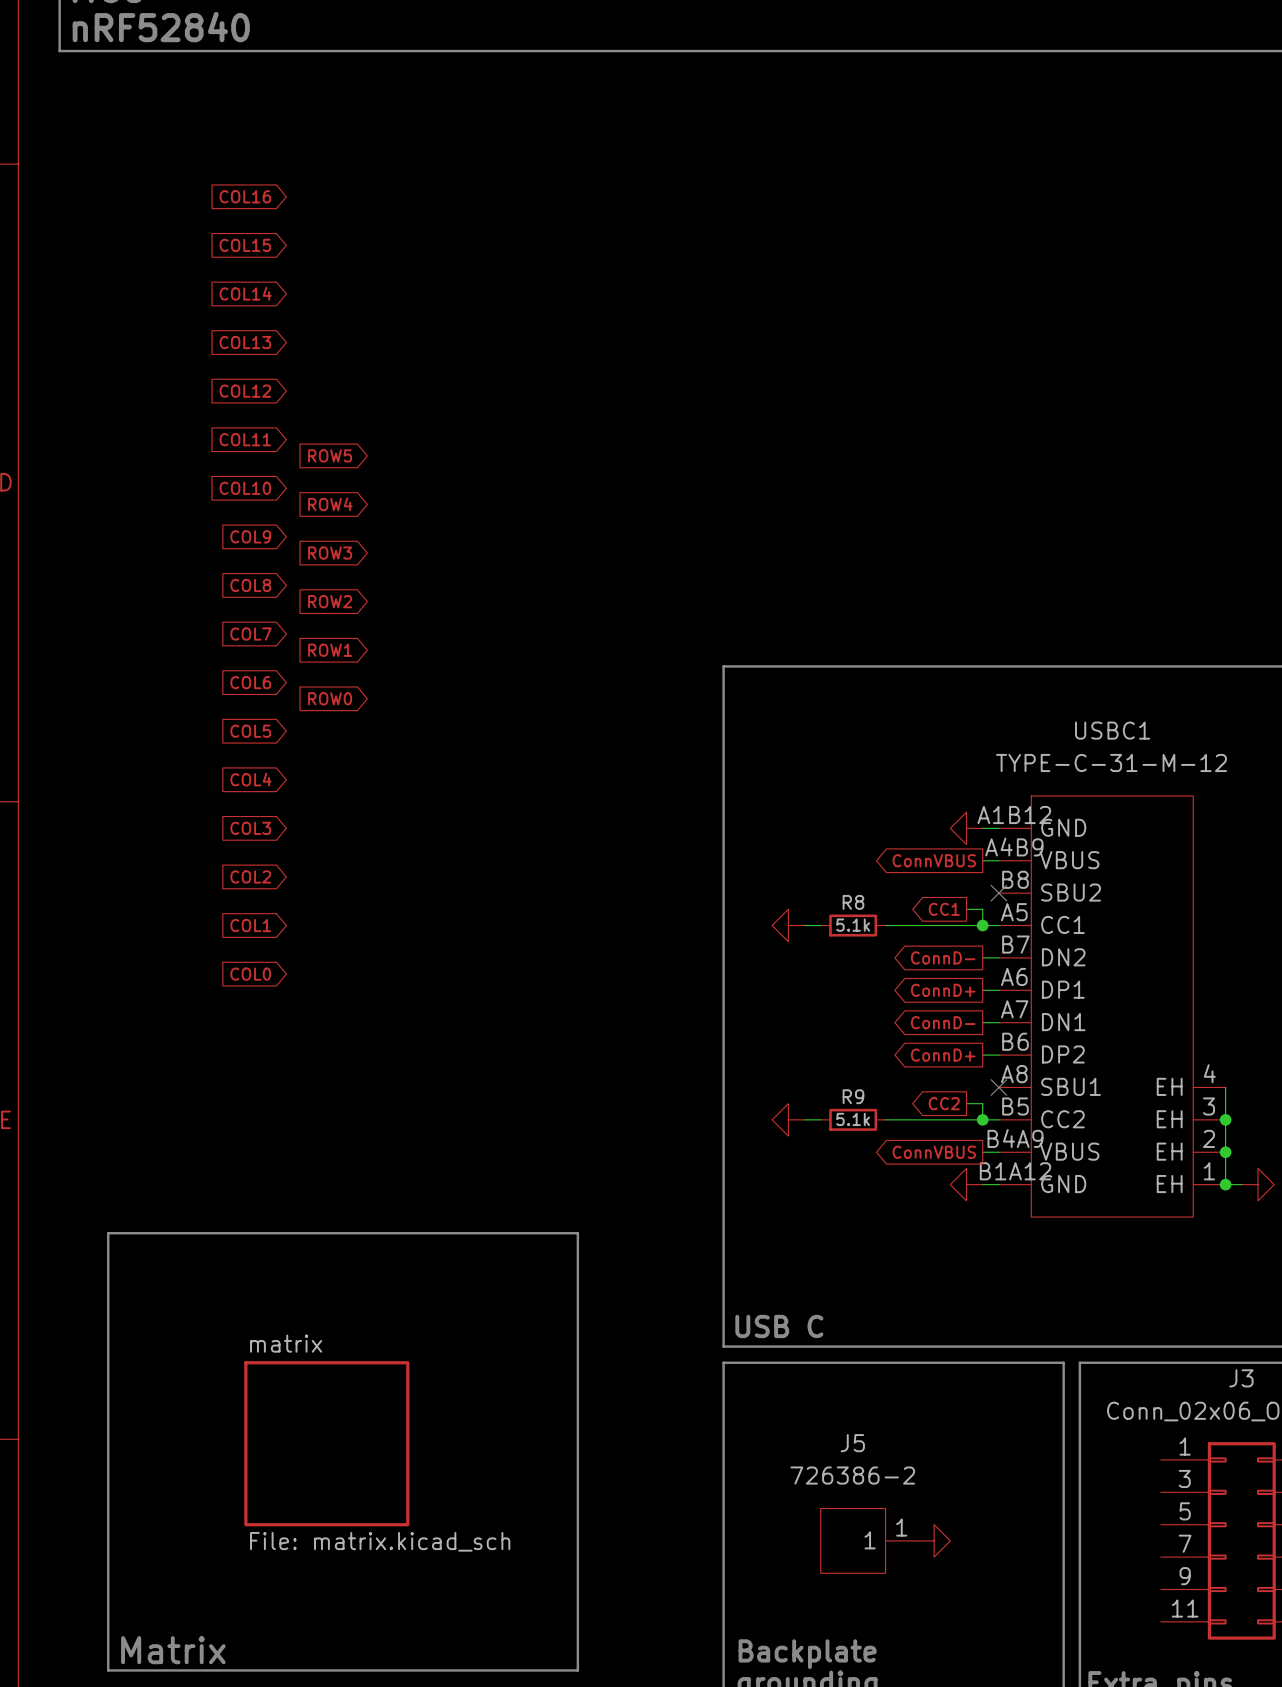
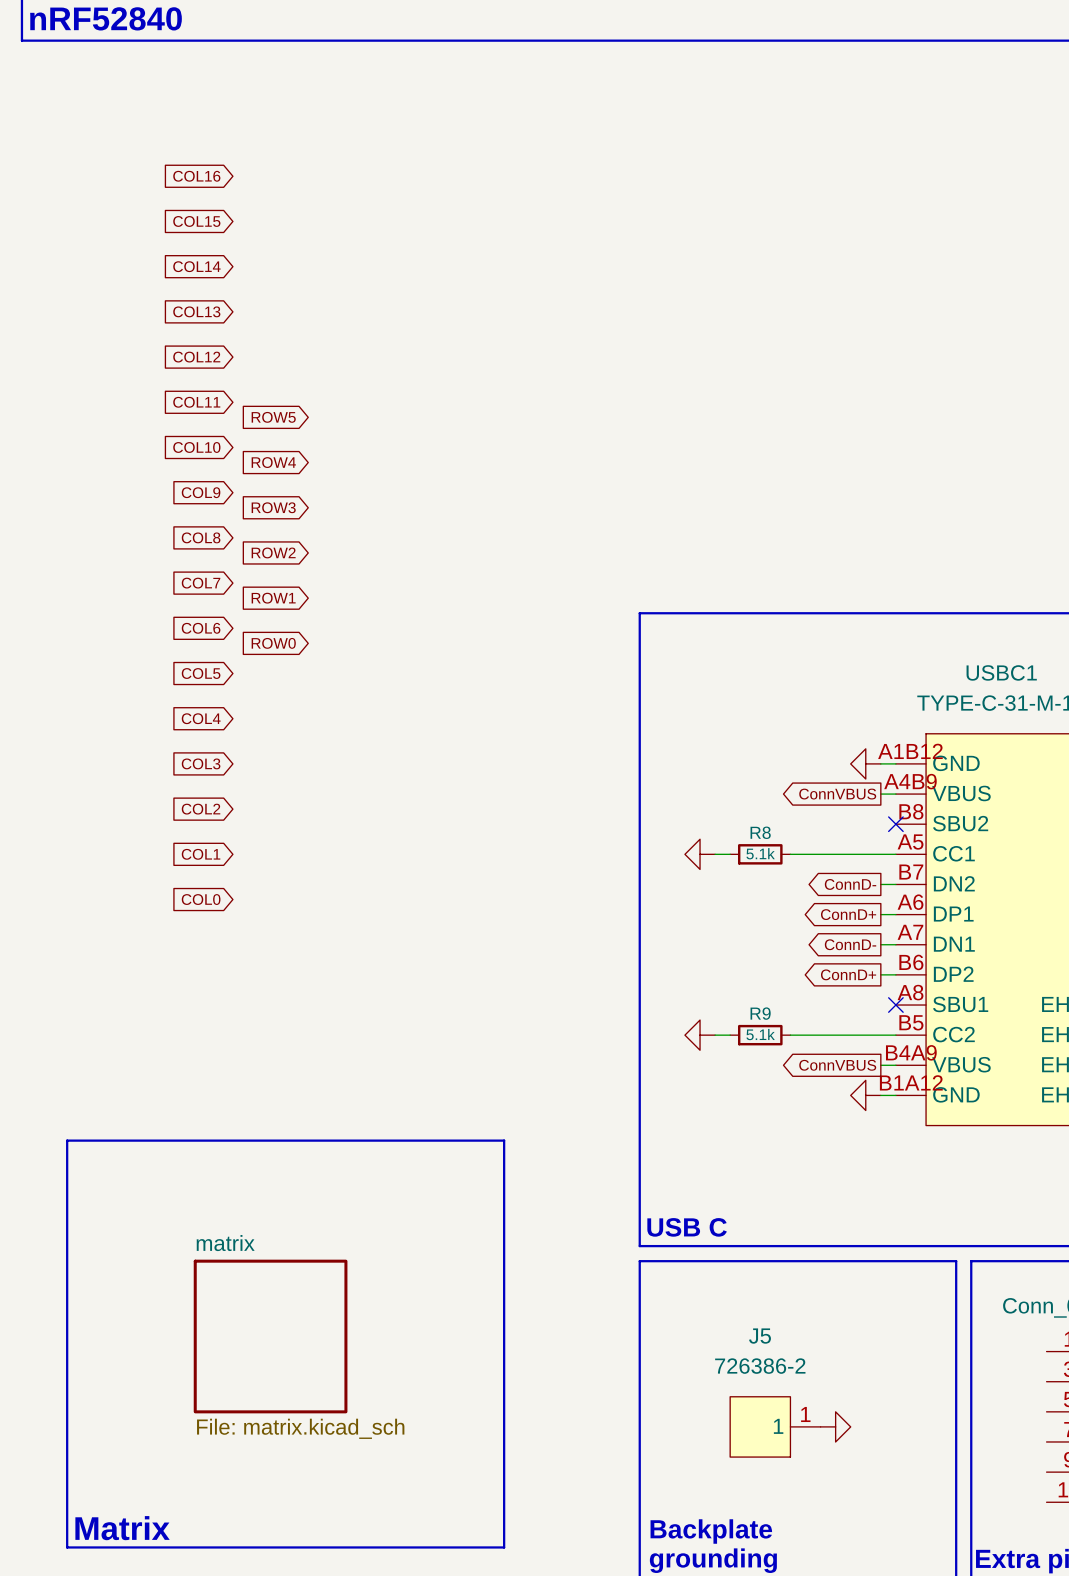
global label: CC1 (944, 909) -> none
wire: (966, 909) (982, 909) (982, 925) -> none
junction: (982, 925) -> none
global label: CC2 (944, 1103) -> none
wire: (966, 1103) (982, 1103) (982, 1119) -> none
junction: (982, 1119) -> none

